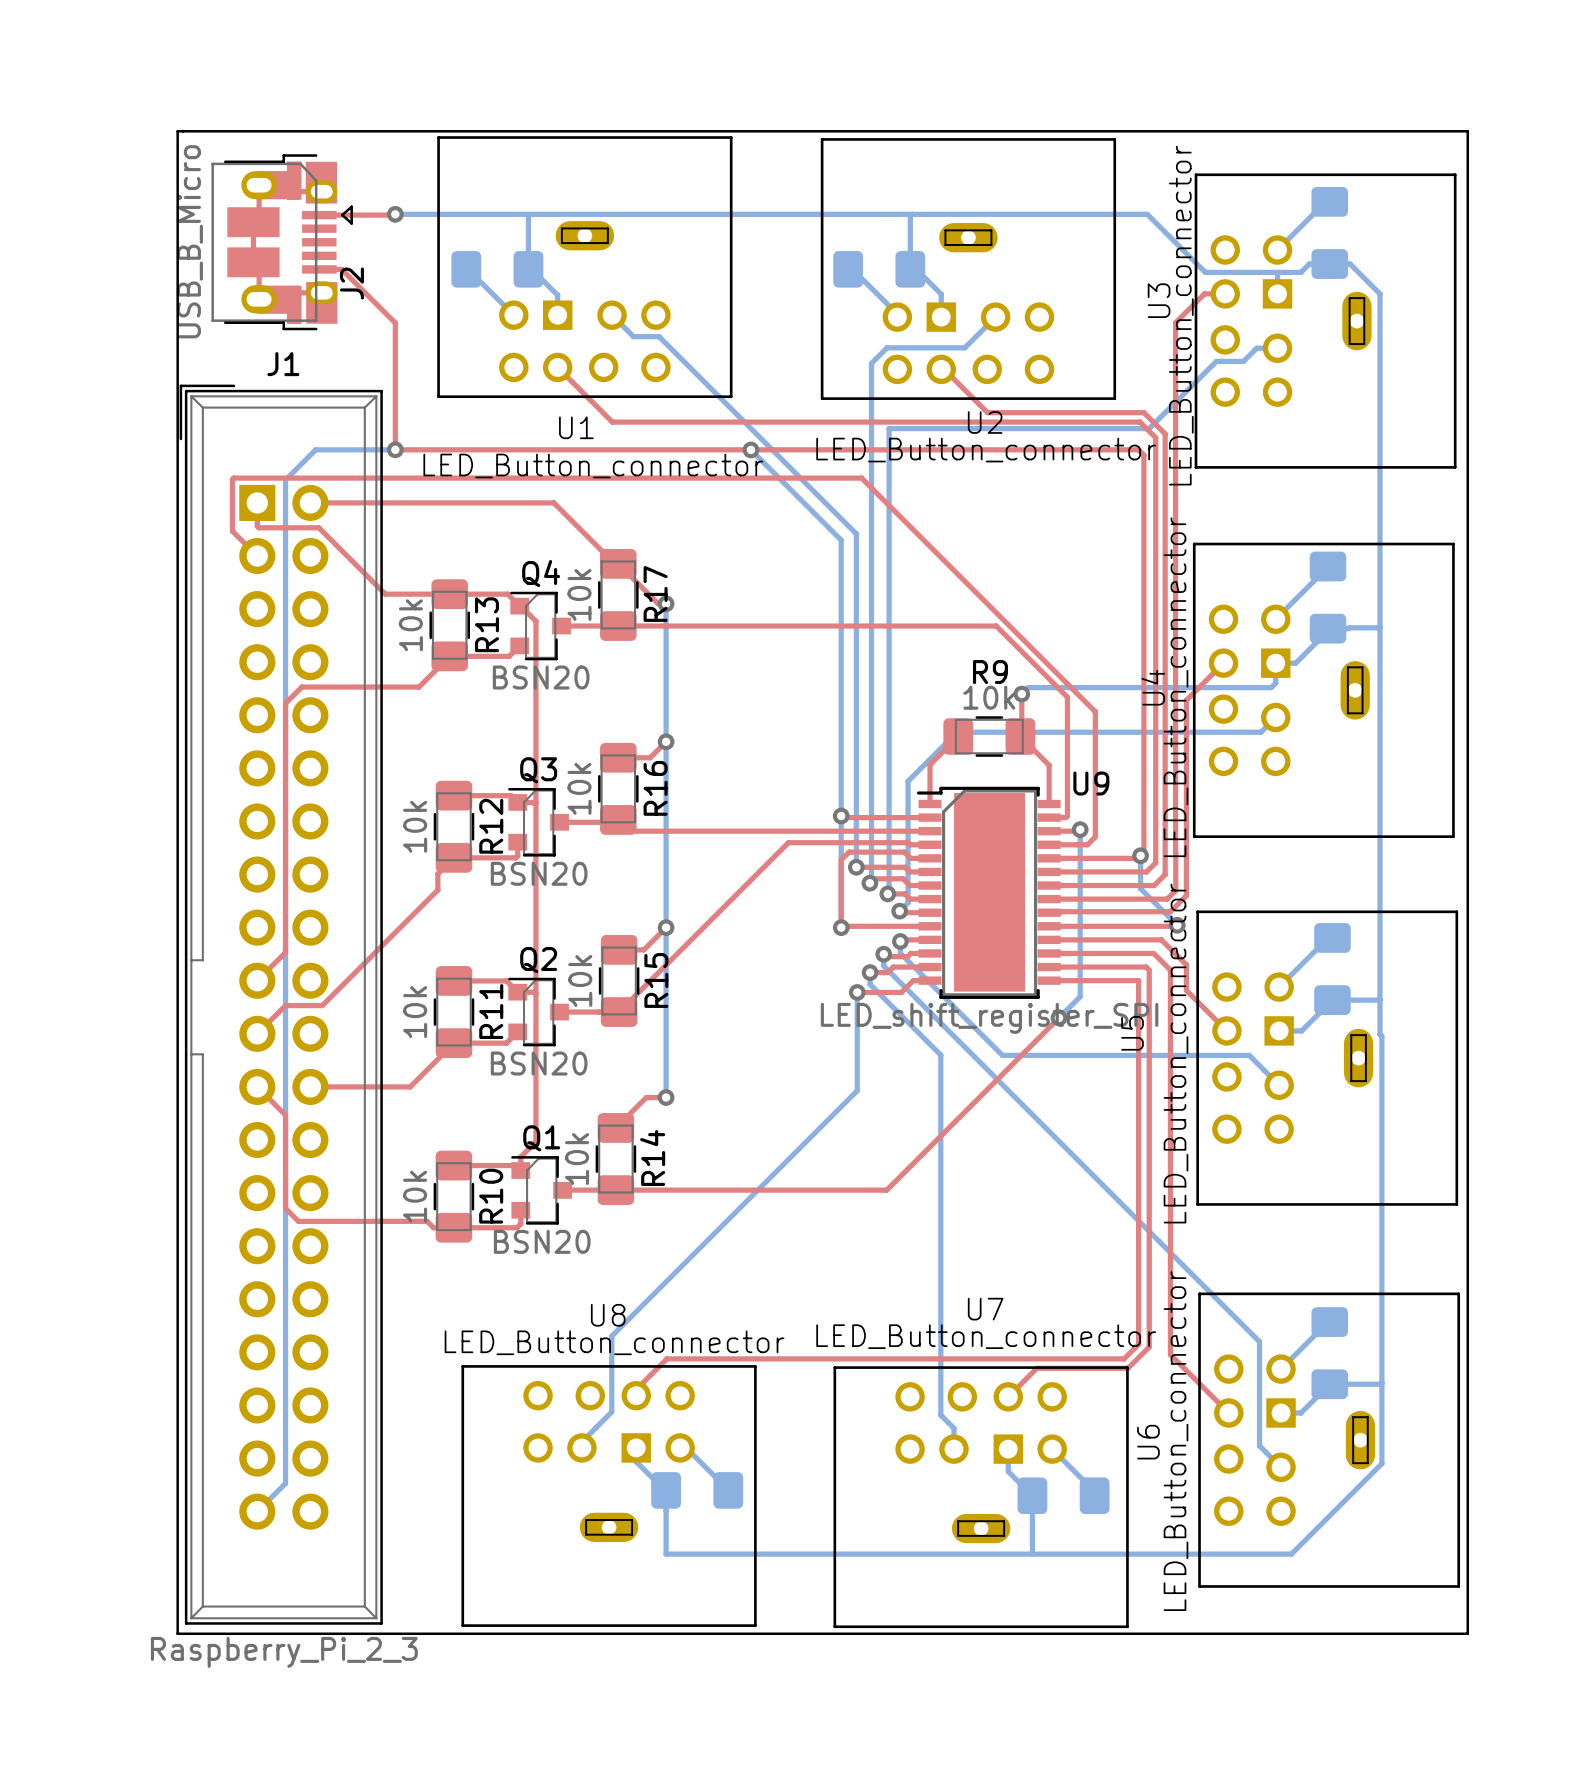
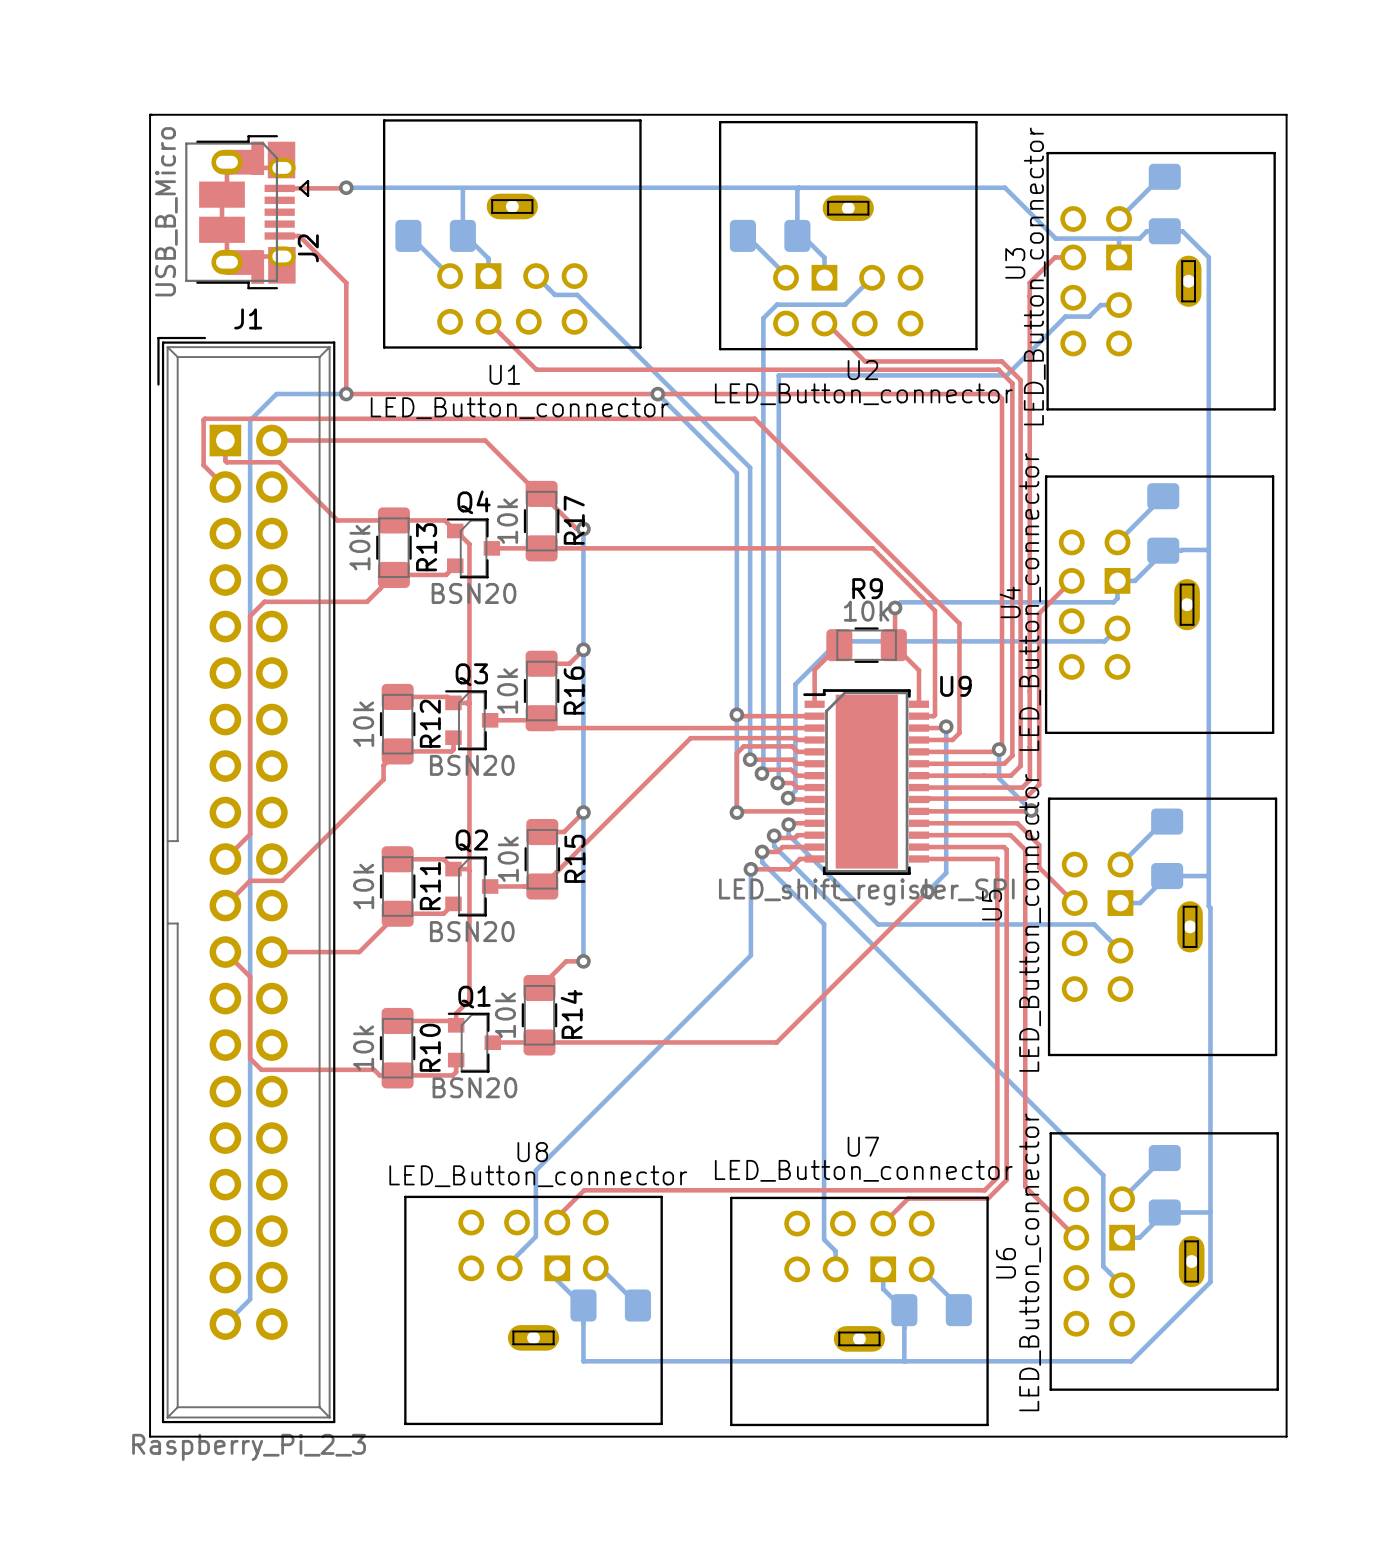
board edge: none -> (150, 114) (150, 1436) (1286, 1436) (1286, 114) (151, 114)
line: (177, 131) (1467, 131) (1467, 1633) (177, 1633) (177, 131) -> none

